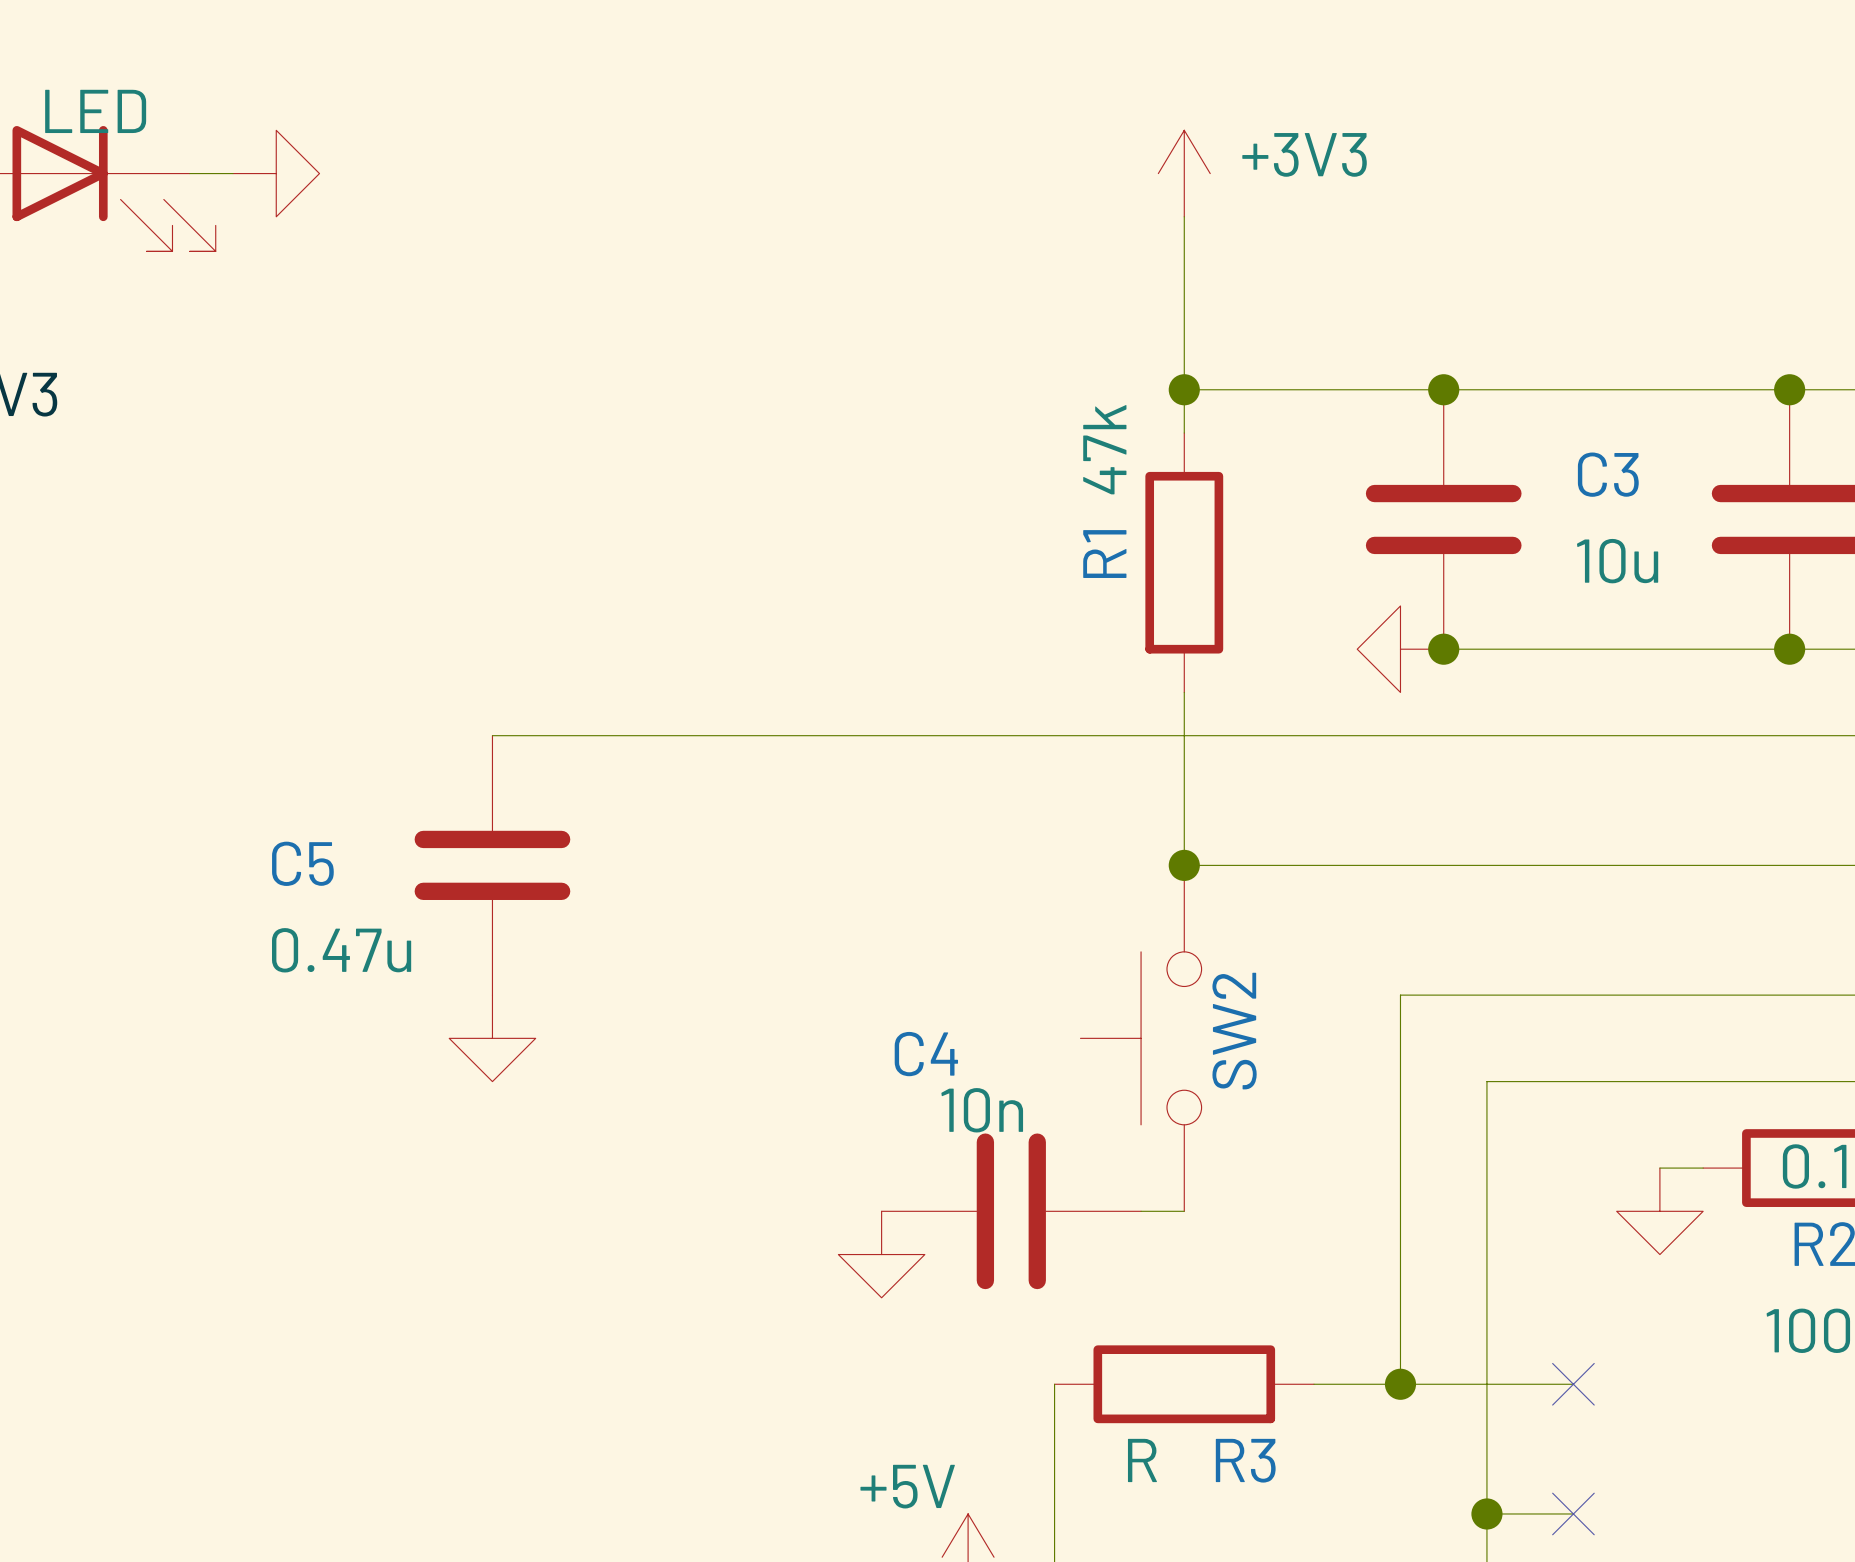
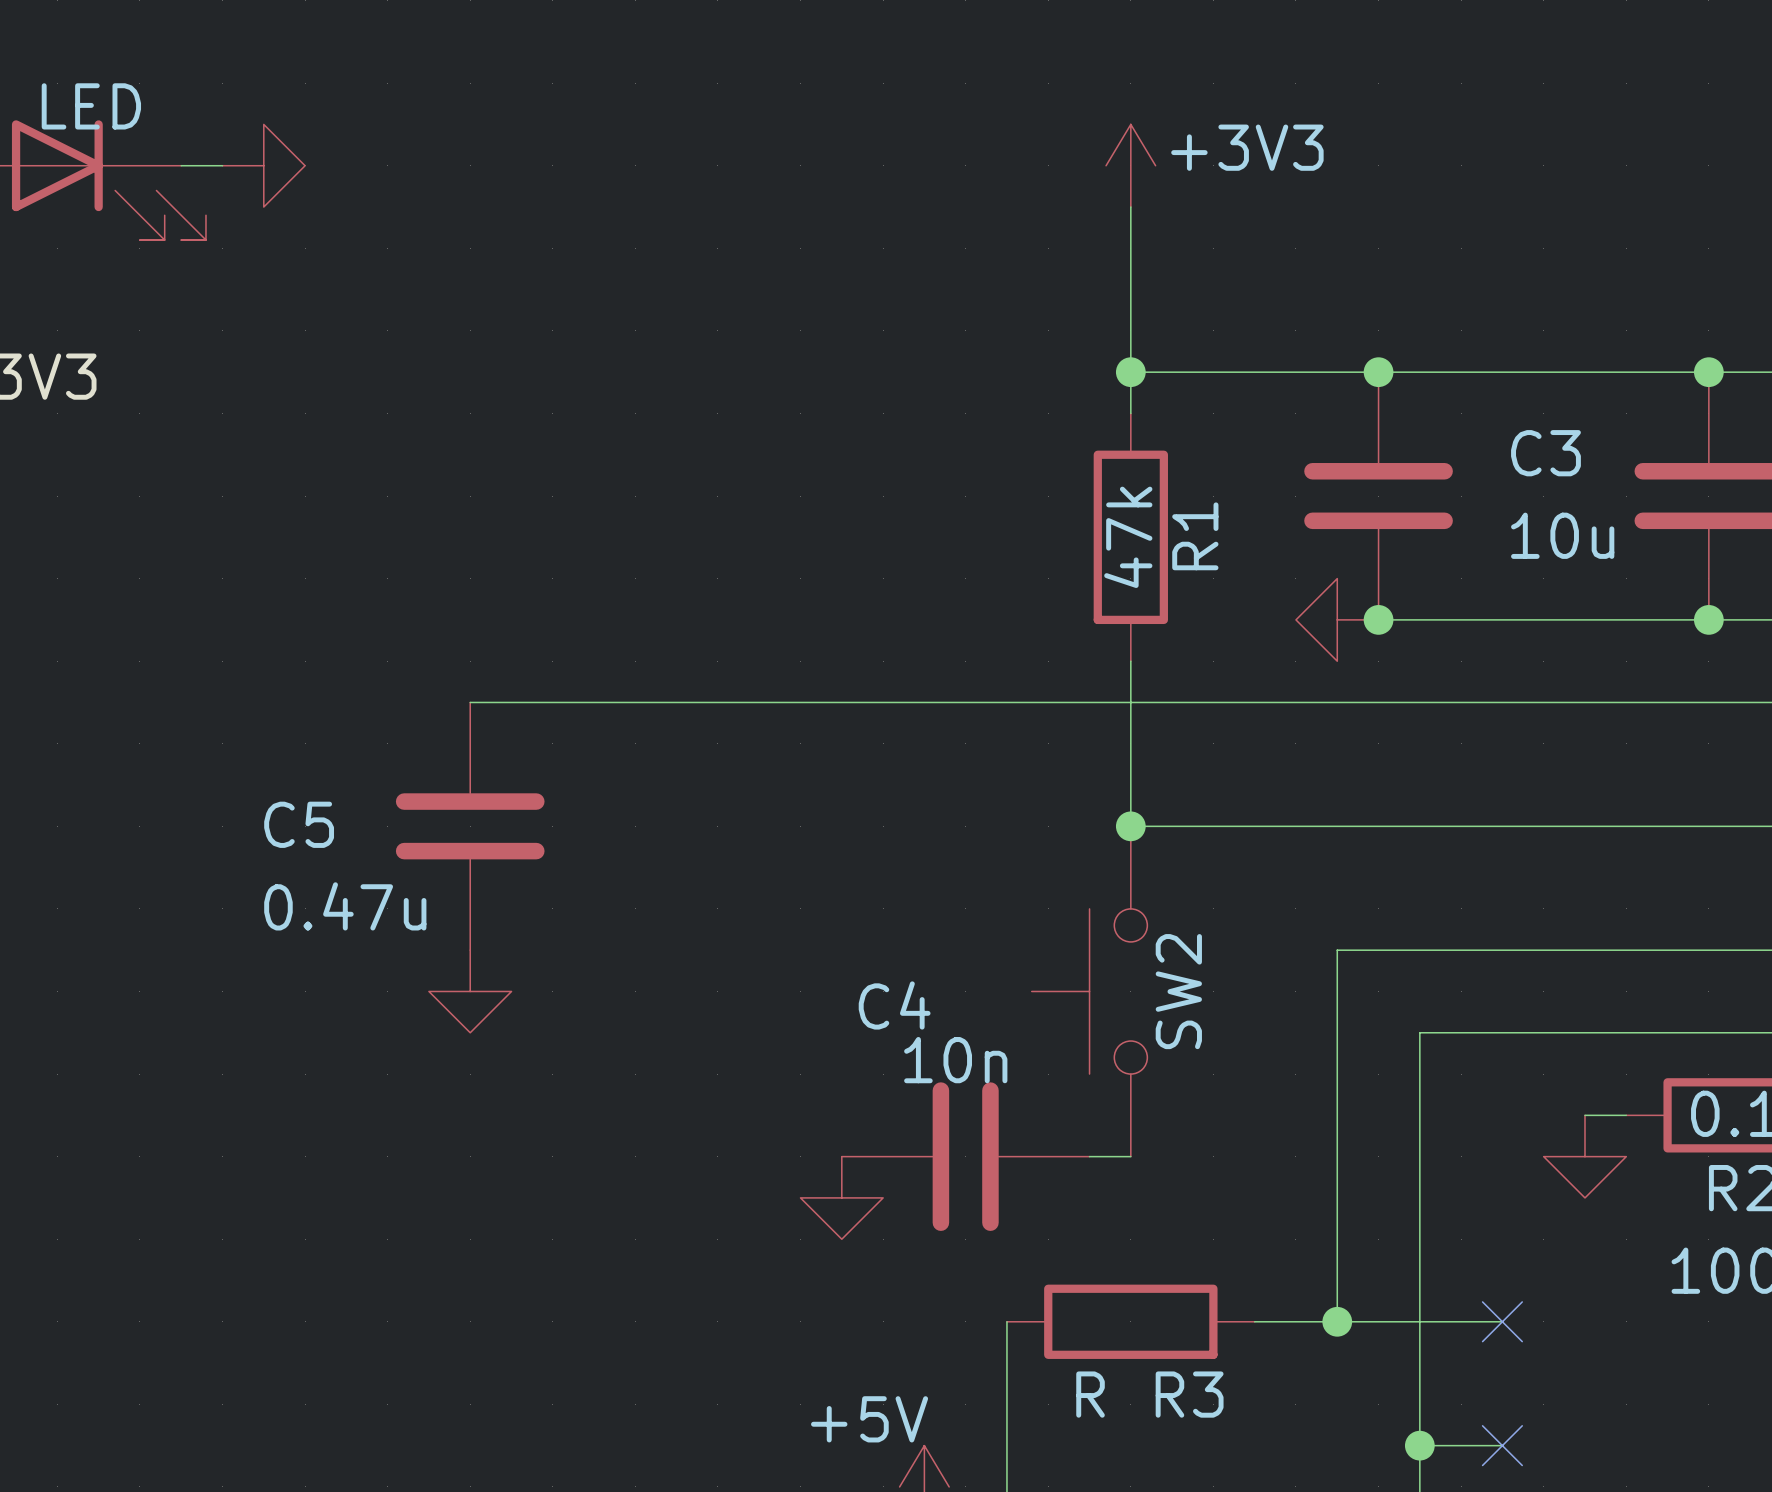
R1 value position: 47k (1104, 449) -> 47k (1128, 537)
R1 name position: R1 (1104, 554) -> R1 (1195, 536)

